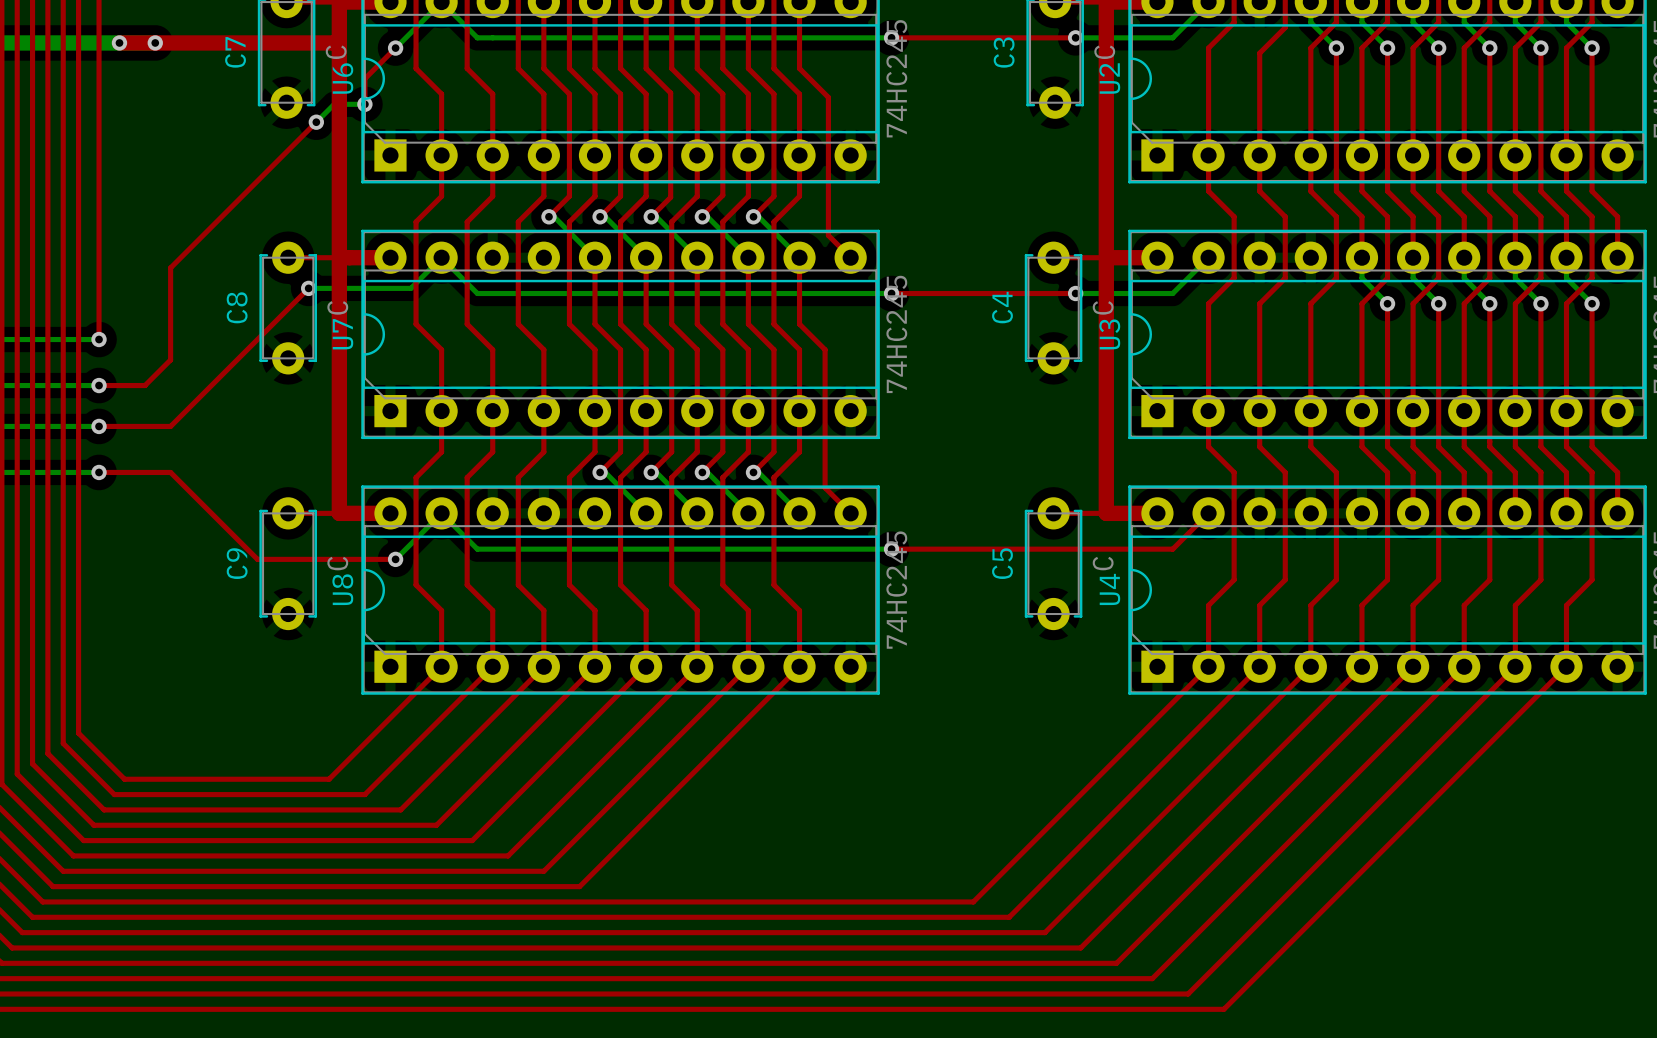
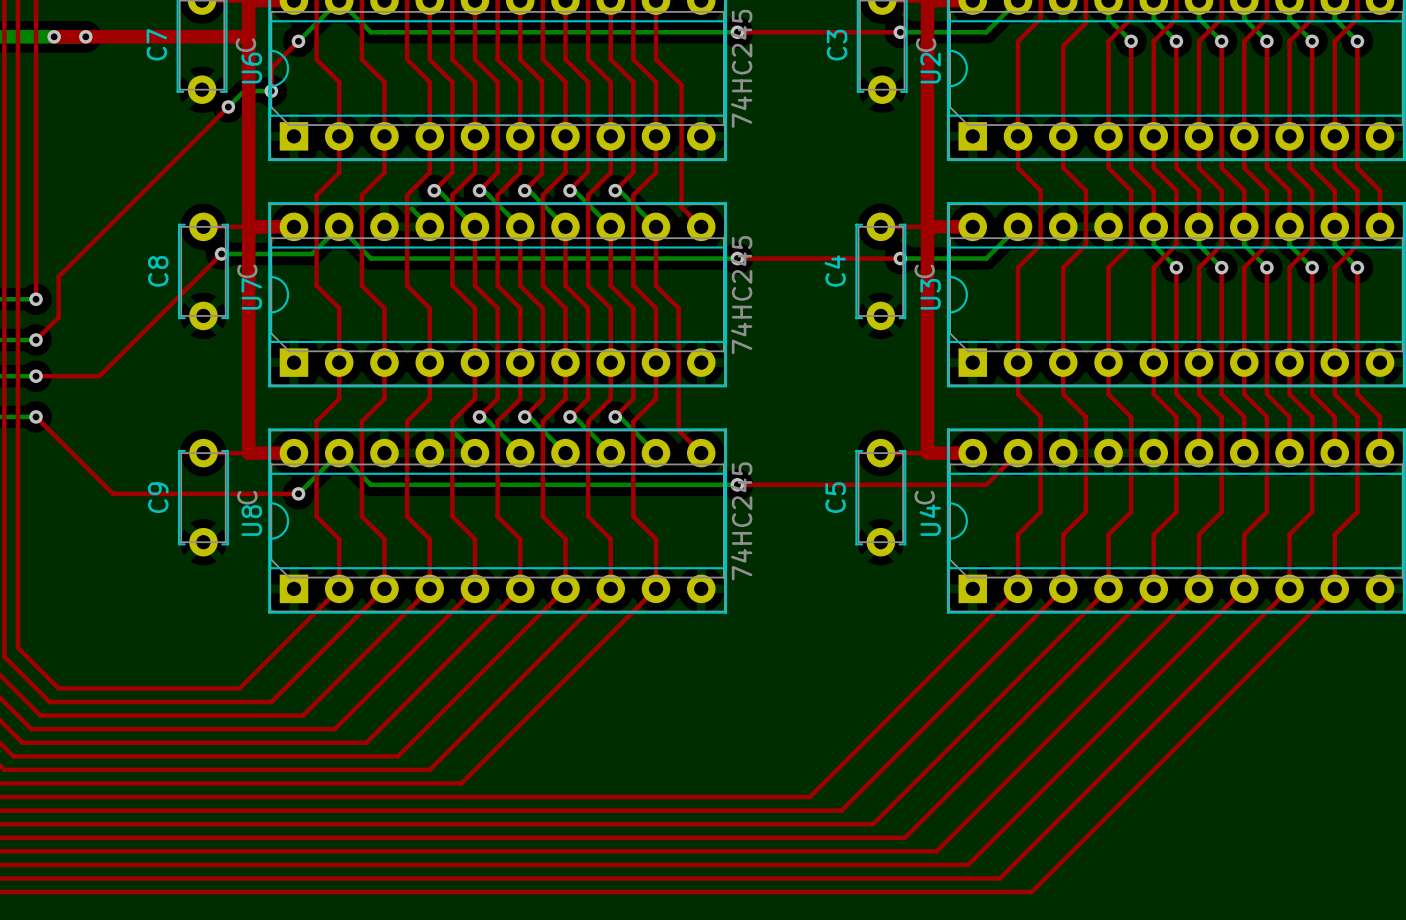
bottom track: none -> (411, 208) (429, 226)
top track: (170, 267) (170, 359) (145, 385) (99, 385) -> (99, 235) (58, 276) (58, 317) (36, 339)
top track: (99, 472) (170, 472) (257, 559) -> (36, 416) (112, 493) (176, 493)
bottom track: none -> (452, 430) (474, 453)

